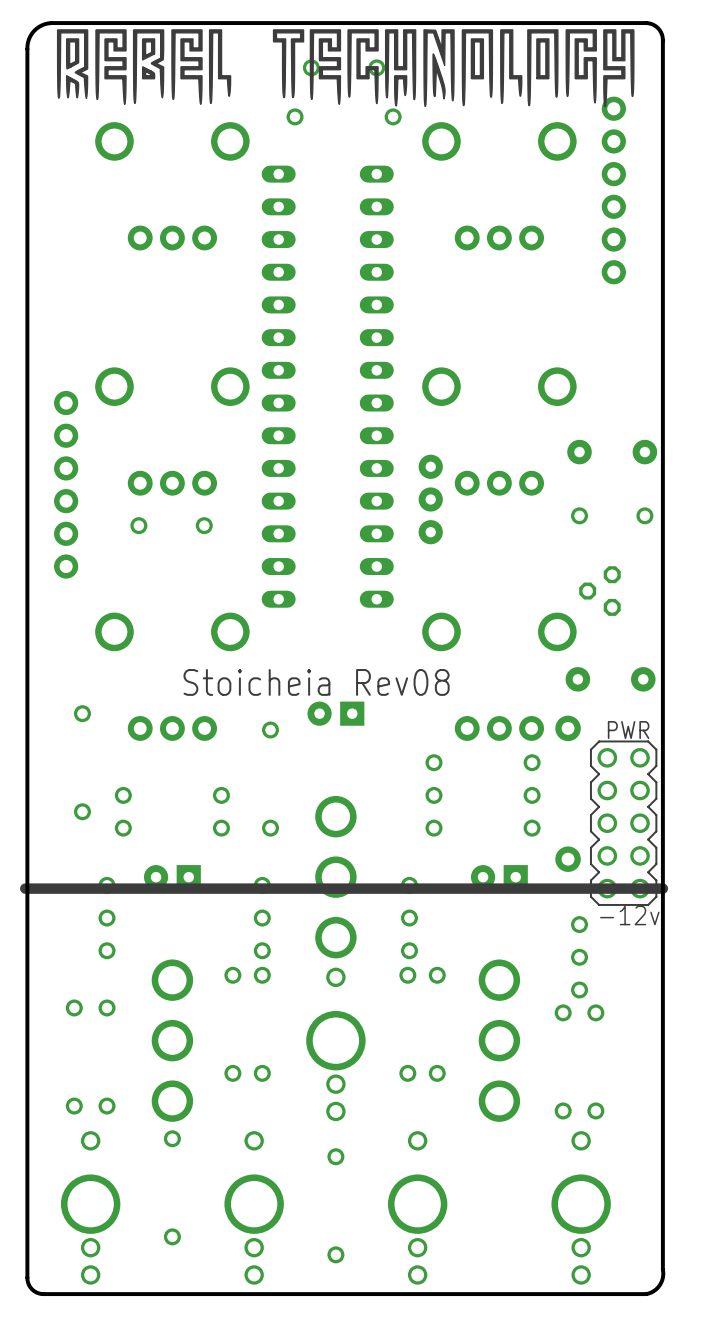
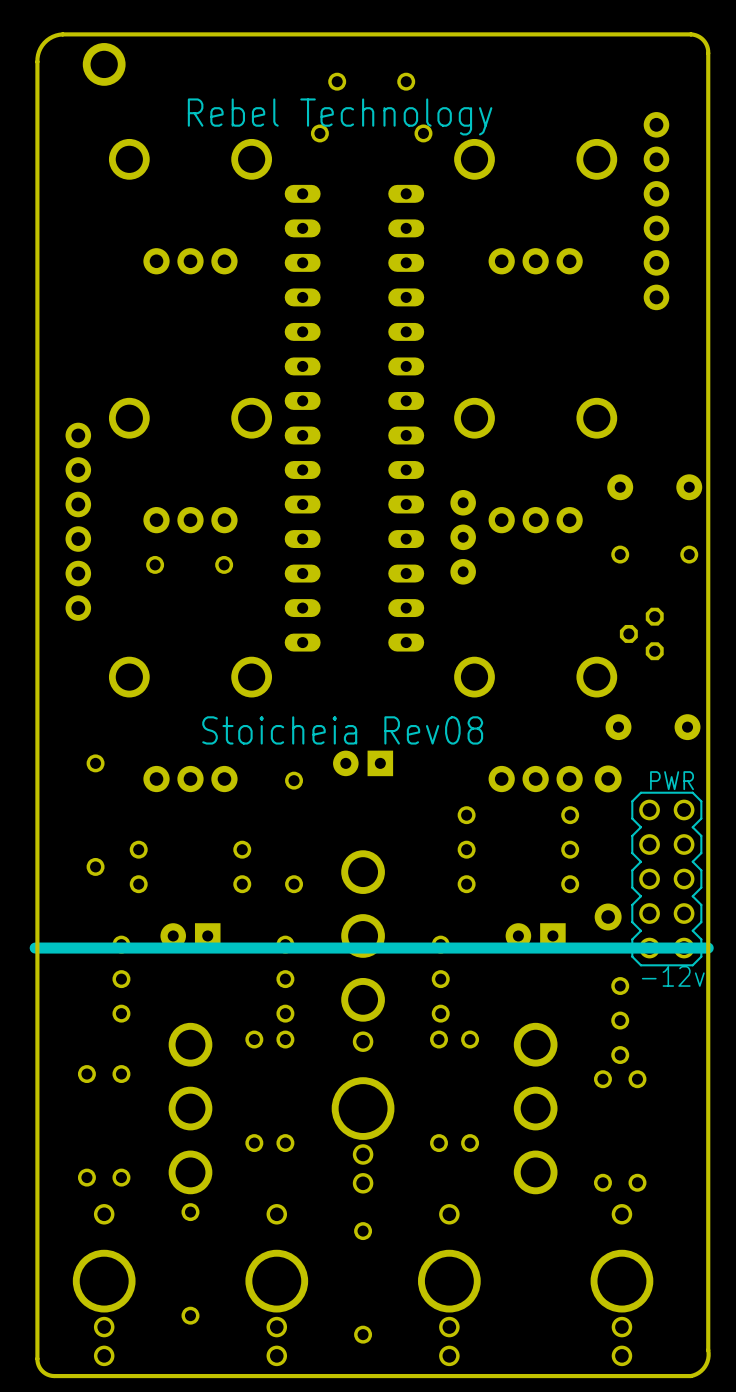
drawing: [56, 29, 232, 106] -> none
drawing: [272, 29, 635, 108] -> none
part: none -> (104, 64)
text: none -> Rebel Technology (340, 116)

